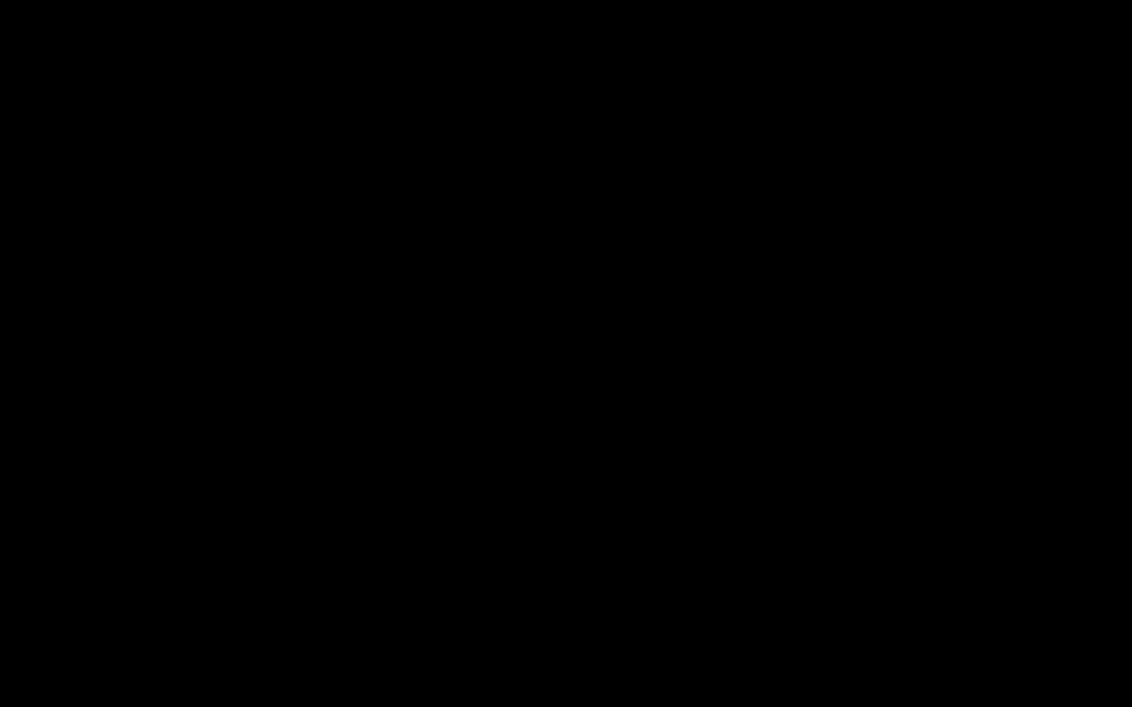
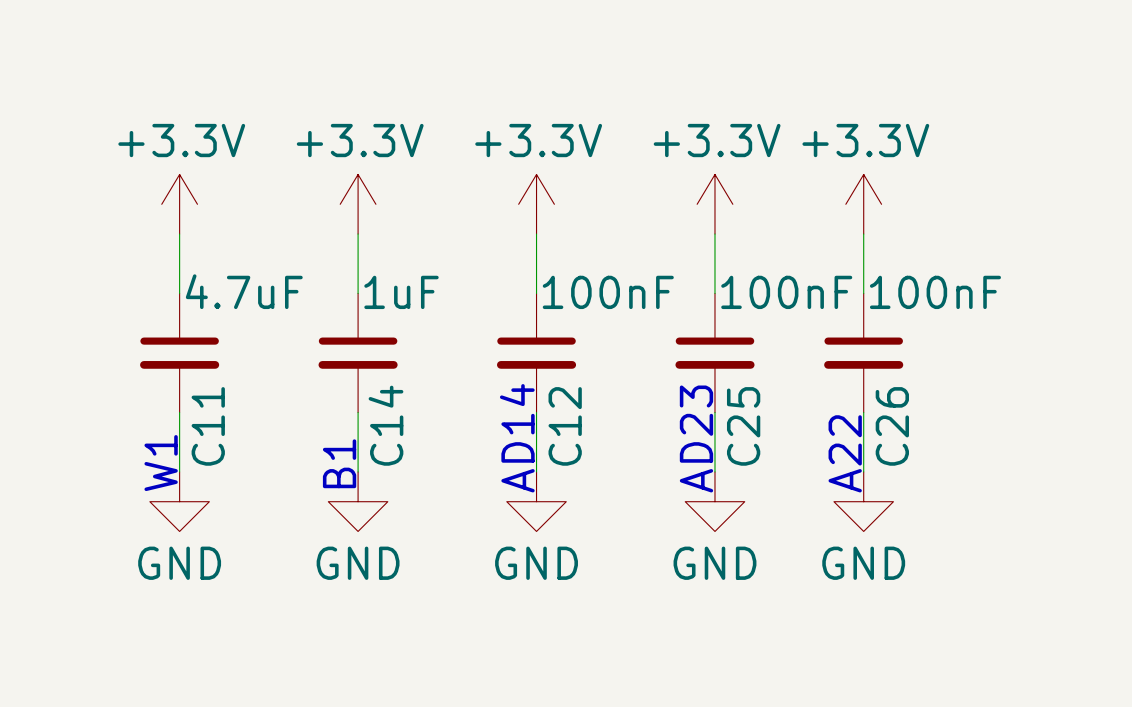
power symbol: none -> +3.3V (179, 204)
power symbol: none -> +3.3V (358, 204)
power symbol: none -> +3.3V (536, 204)
power symbol: none -> +3.3V (714, 204)
power symbol: none -> +3.3V (863, 204)
wire: none -> (179, 234) (179, 293)
wire: none -> (358, 234) (358, 293)
wire: none -> (536, 234) (536, 293)
wire: none -> (714, 234) (714, 293)
wire: none -> (863, 234) (863, 293)
C11: none -> 4.7uF (179, 352)
C14: none -> 1uF (358, 352)
C12: none -> 100nF (536, 352)
C25: none -> 100nF (714, 352)
C26: none -> 100nF (863, 352)
wire: none -> (179, 412) (179, 471)
wire: none -> (358, 412) (358, 471)
wire: none -> (536, 412) (536, 471)
wire: none -> (714, 412) (714, 471)
wire: none -> (863, 412) (863, 471)
text: none -> AD14 (517, 438)
text: none -> AD23 (696, 438)
text: none -> A22 (845, 453)
text: none -> B1 (339, 463)
text: none -> W1 (161, 463)
power symbol: none -> GND (179, 501)
power symbol: none -> GND (358, 501)
power symbol: none -> GND (536, 501)
power symbol: none -> GND (714, 501)
power symbol: none -> GND (863, 501)

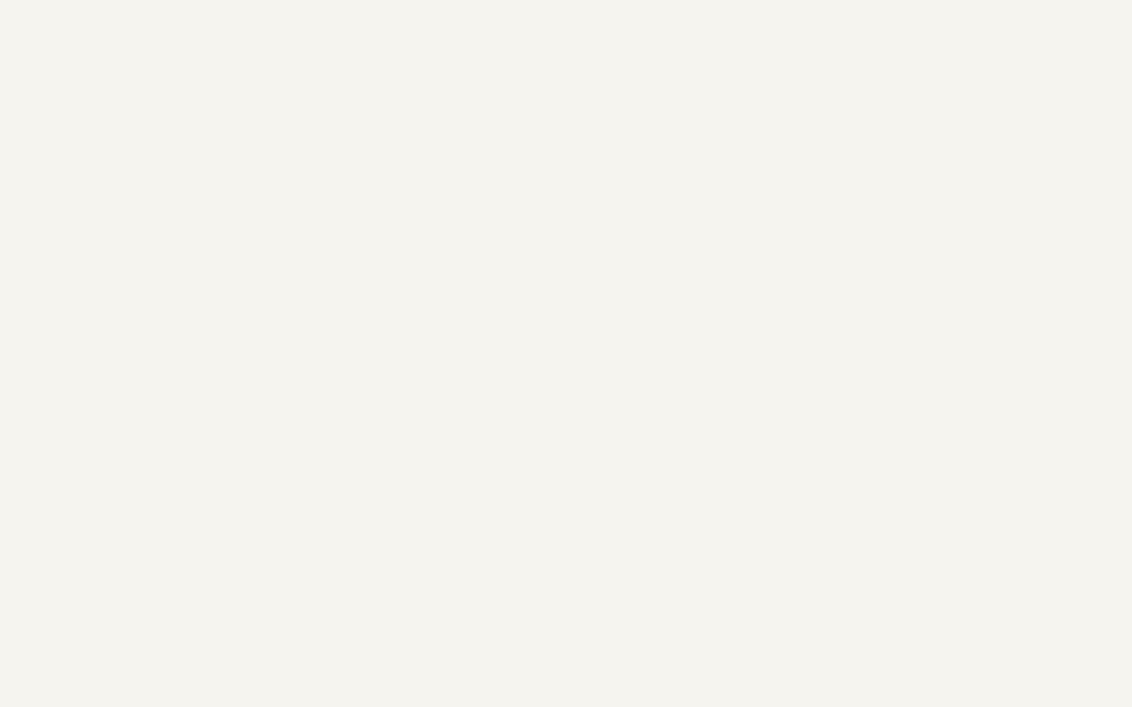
power symbol: +3.3V (179, 204) -> none
power symbol: +3.3V (358, 204) -> none
power symbol: +3.3V (536, 204) -> none
power symbol: +3.3V (714, 204) -> none
power symbol: +3.3V (863, 204) -> none
wire: (179, 234) (179, 293) -> none
wire: (358, 234) (358, 293) -> none
wire: (536, 234) (536, 293) -> none
wire: (714, 234) (714, 293) -> none
wire: (863, 234) (863, 293) -> none
C11: 4.7uF (179, 352) -> none
C14: 1uF (358, 352) -> none
C12: 100nF (536, 352) -> none
C25: 100nF (714, 352) -> none
C26: 100nF (863, 352) -> none
wire: (179, 412) (179, 471) -> none
wire: (358, 412) (358, 471) -> none
wire: (536, 412) (536, 471) -> none
wire: (714, 412) (714, 471) -> none
wire: (863, 412) (863, 471) -> none
text: AD14 (517, 438) -> none
text: AD23 (696, 438) -> none
text: A22 (845, 453) -> none
text: W1 (161, 463) -> none
text: B1 (339, 463) -> none
power symbol: GND (179, 501) -> none
power symbol: GND (358, 501) -> none
power symbol: GND (536, 501) -> none
power symbol: GND (714, 501) -> none
power symbol: GND (863, 501) -> none

